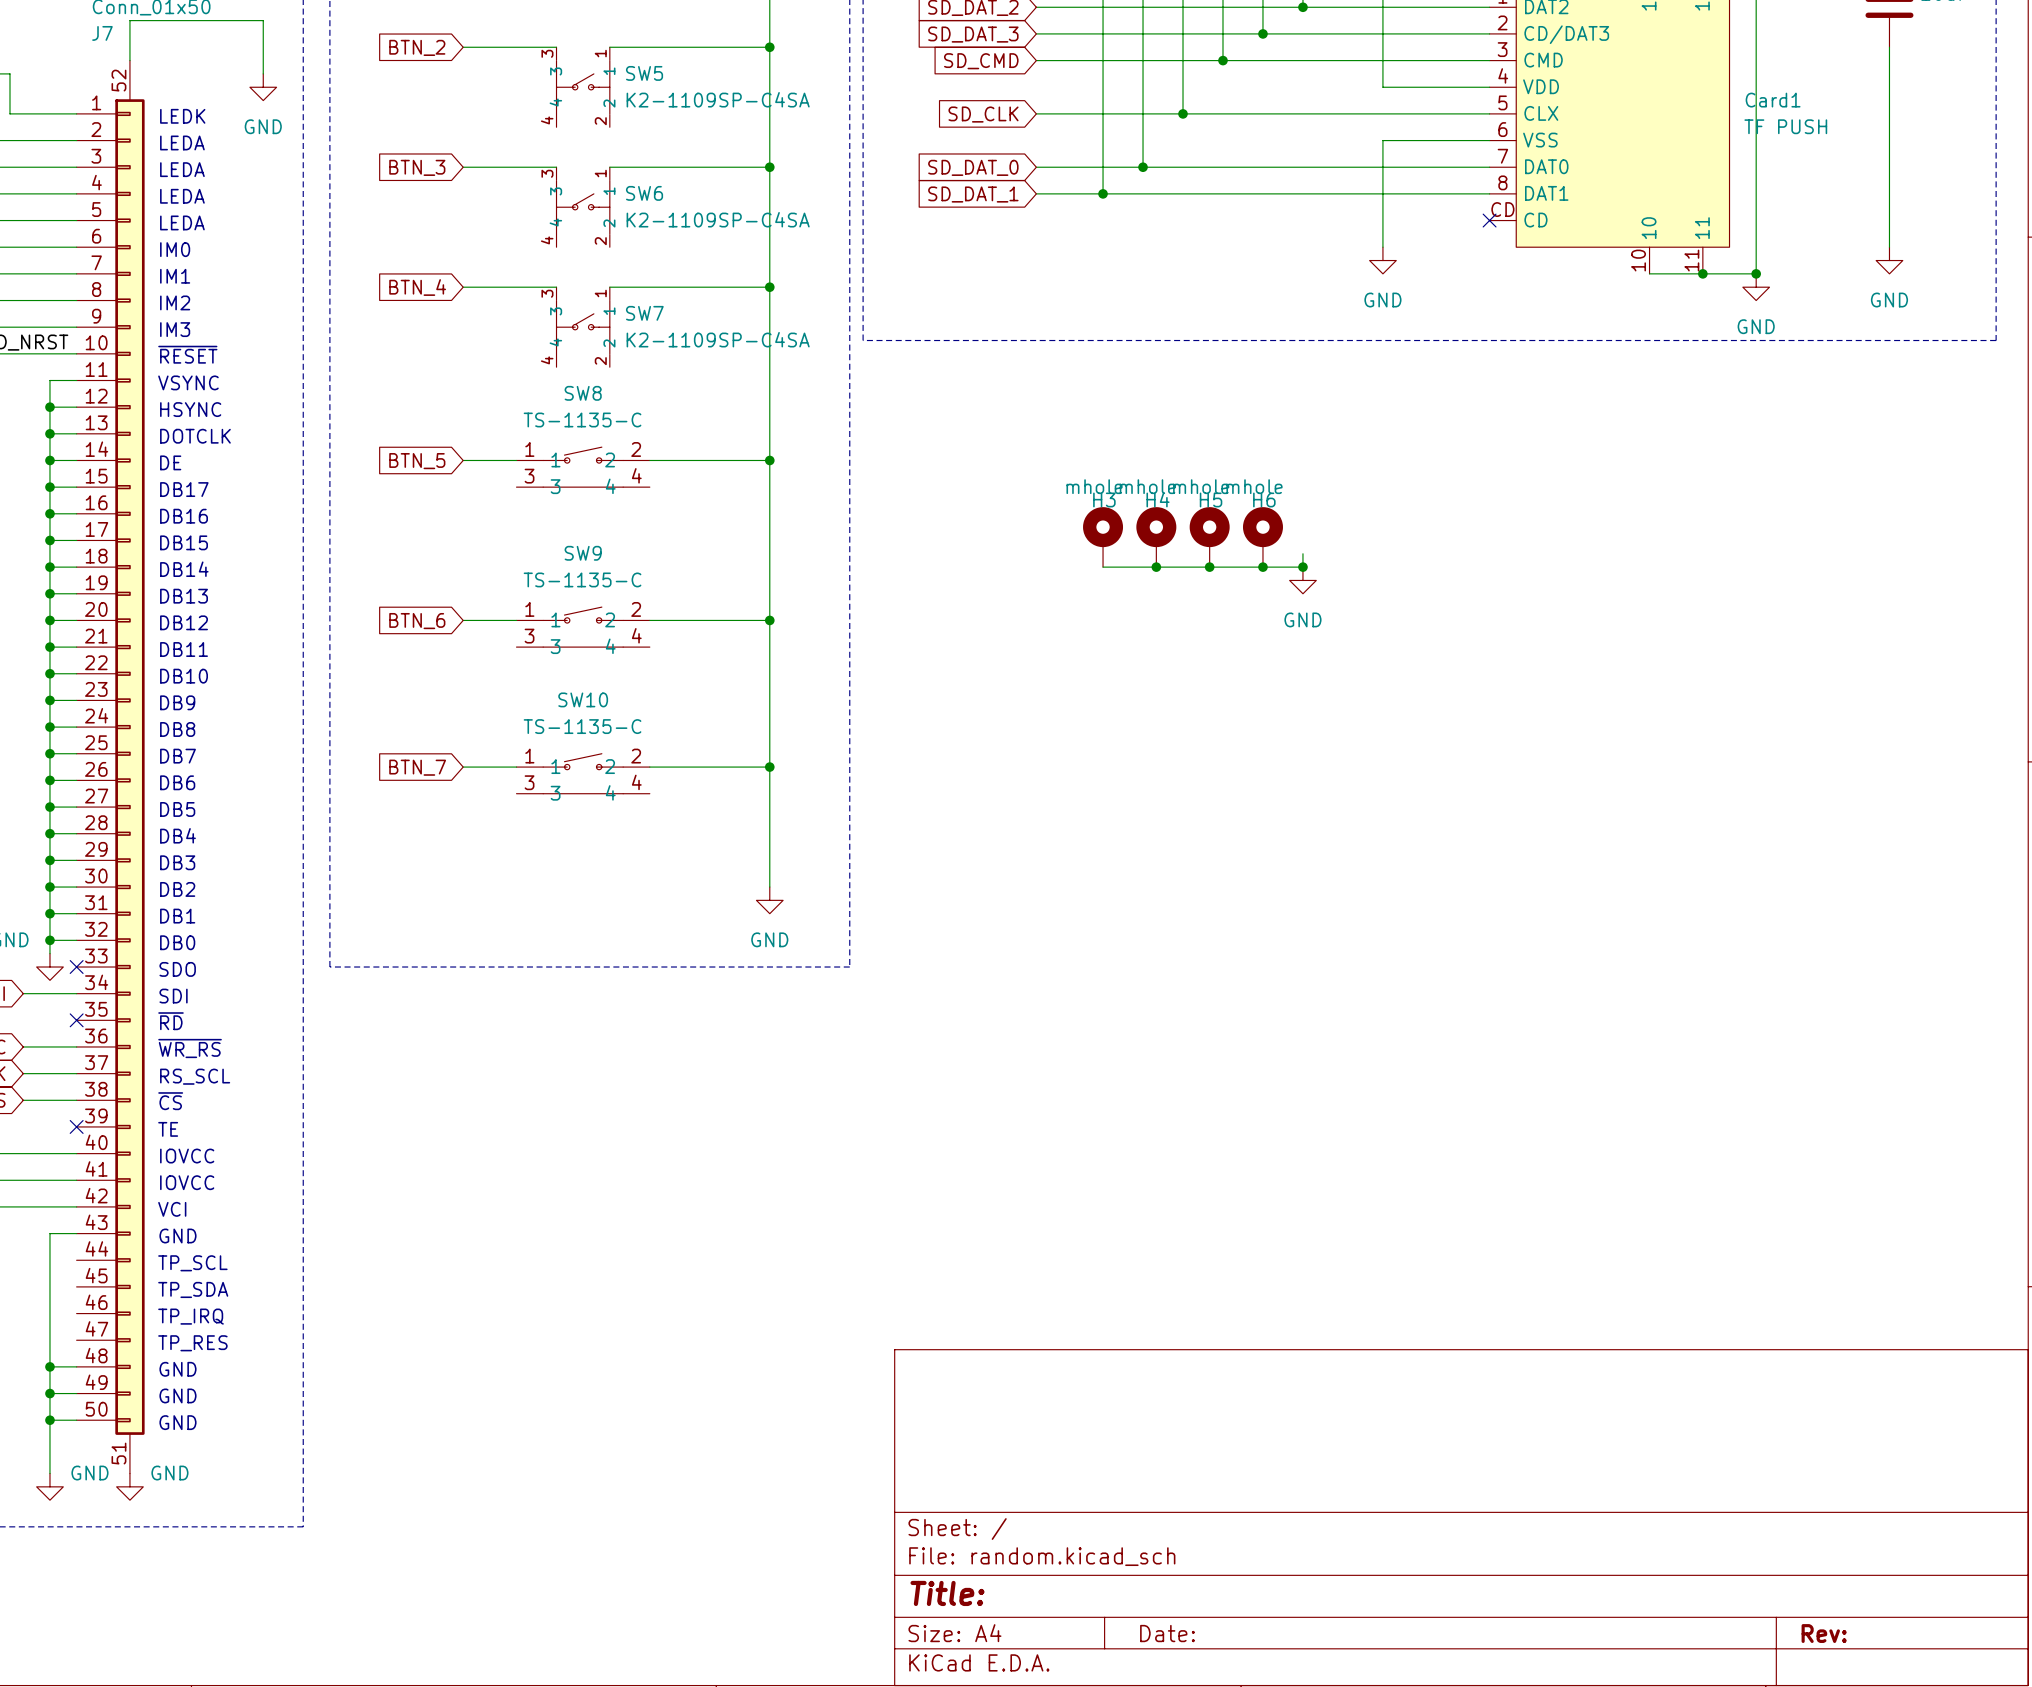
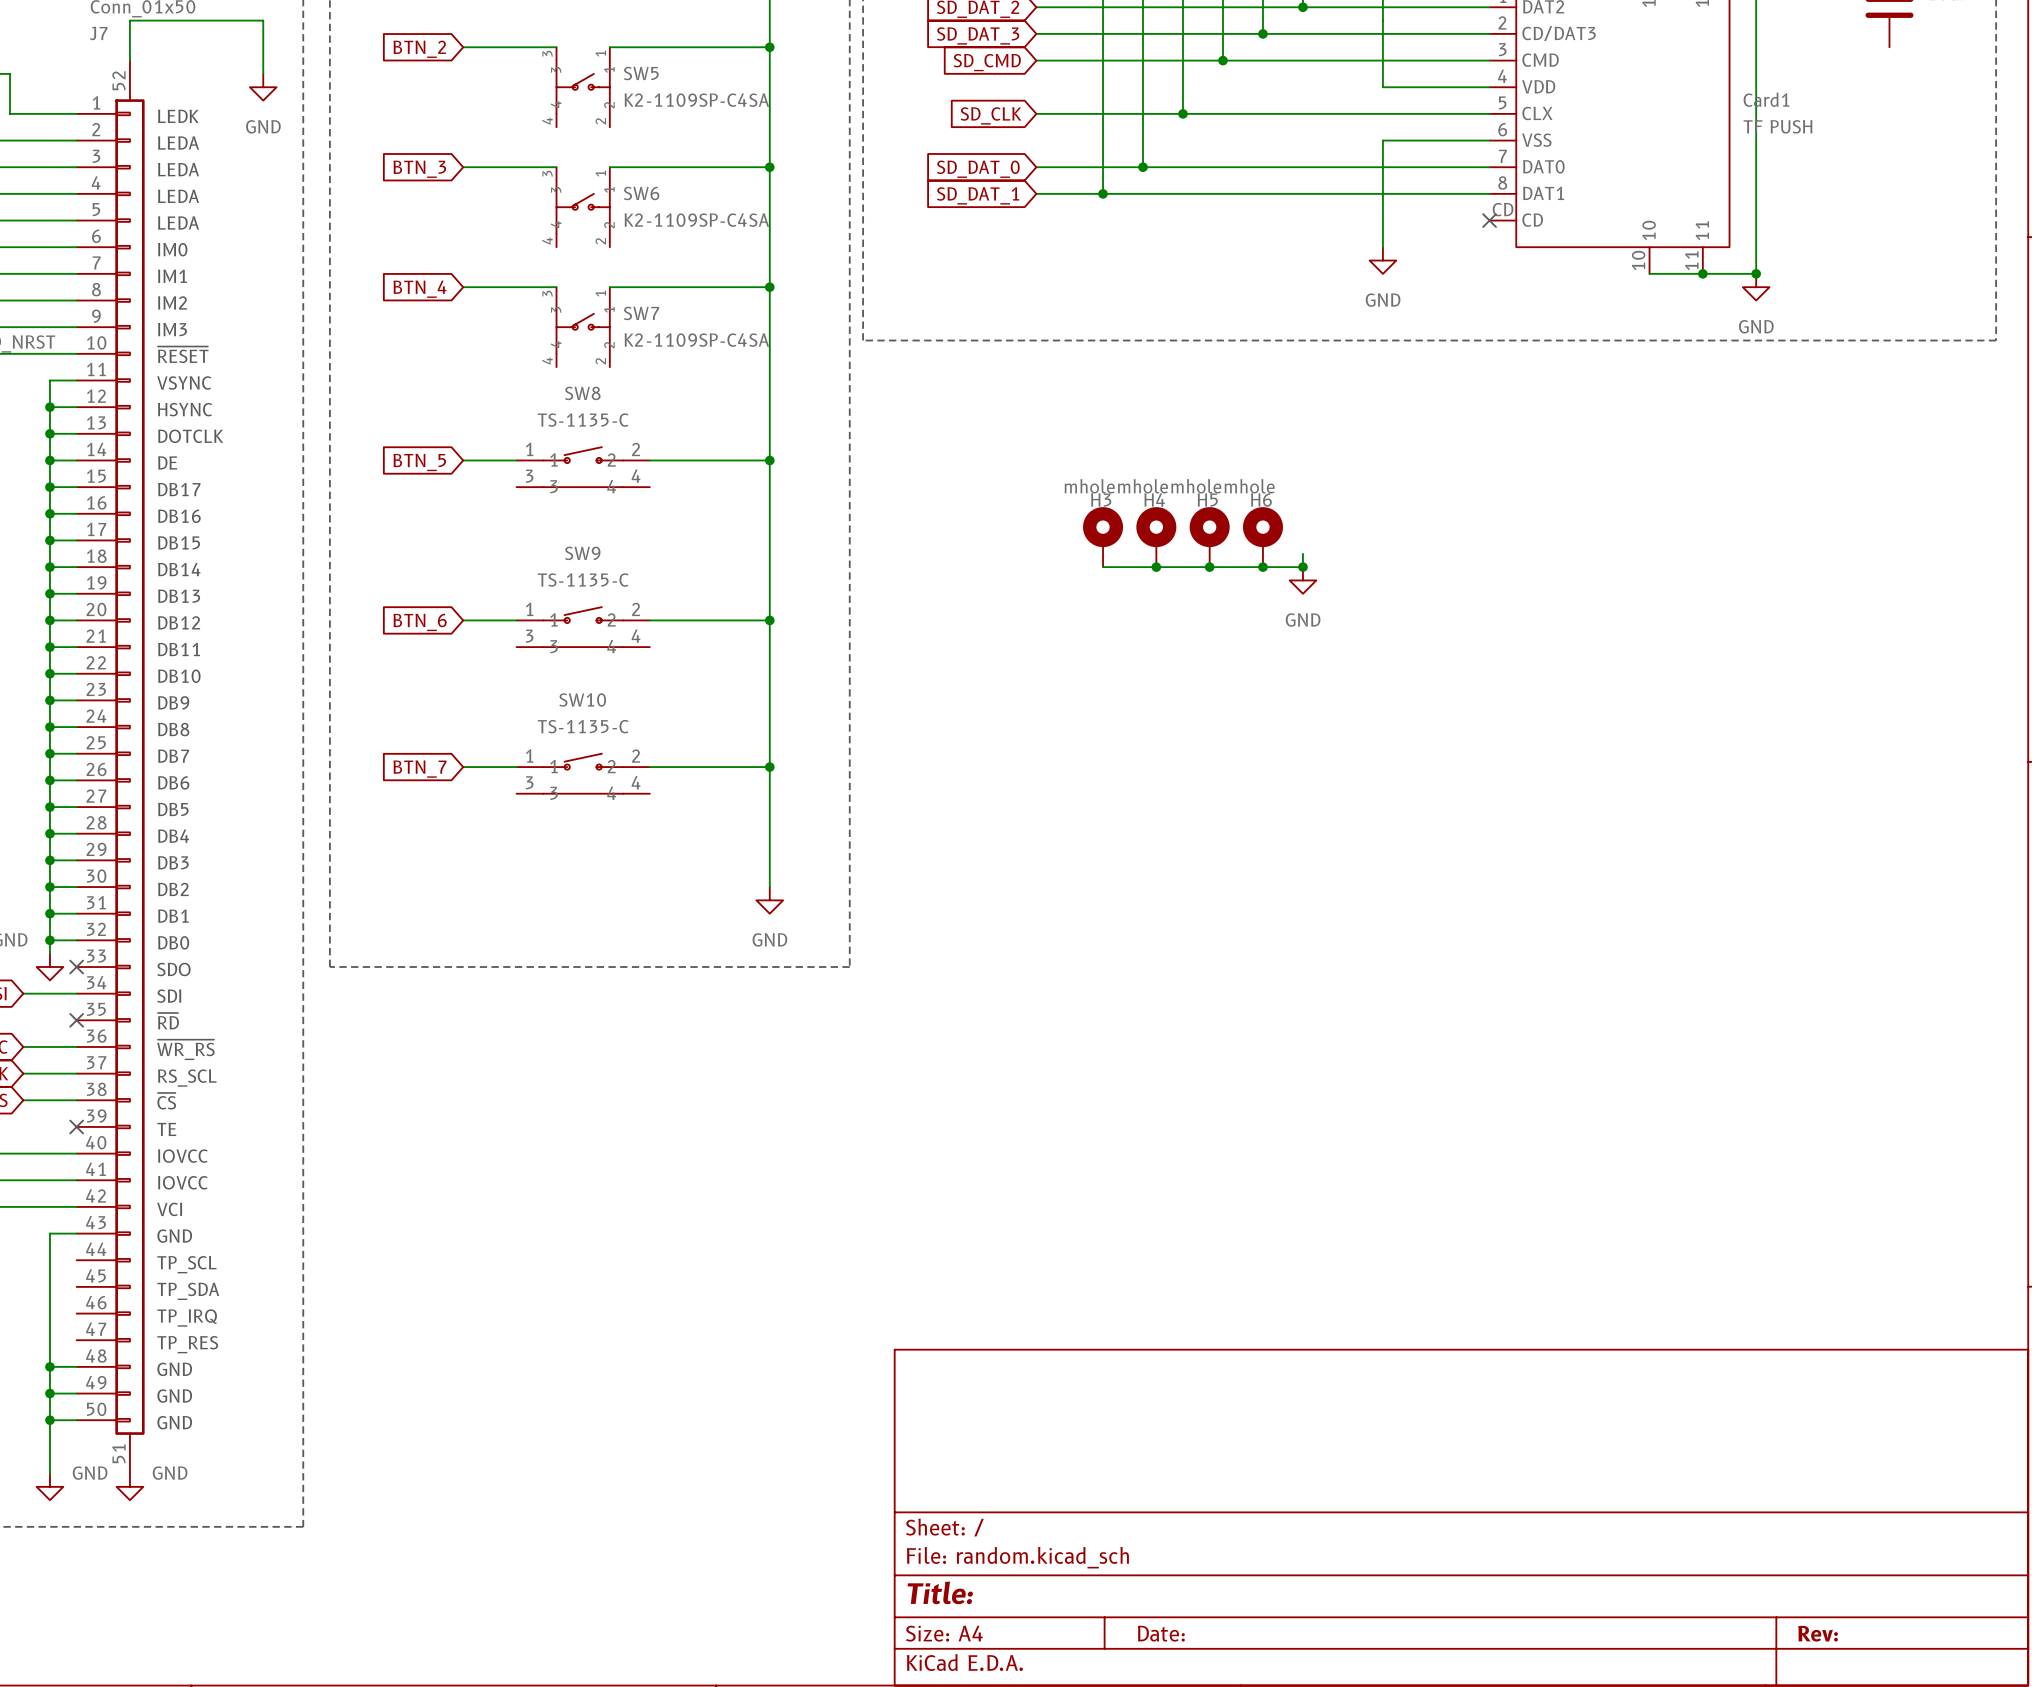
wire: (1889, 47) (1889, 247) -> none
power symbol: GND (1889, 260) -> none

